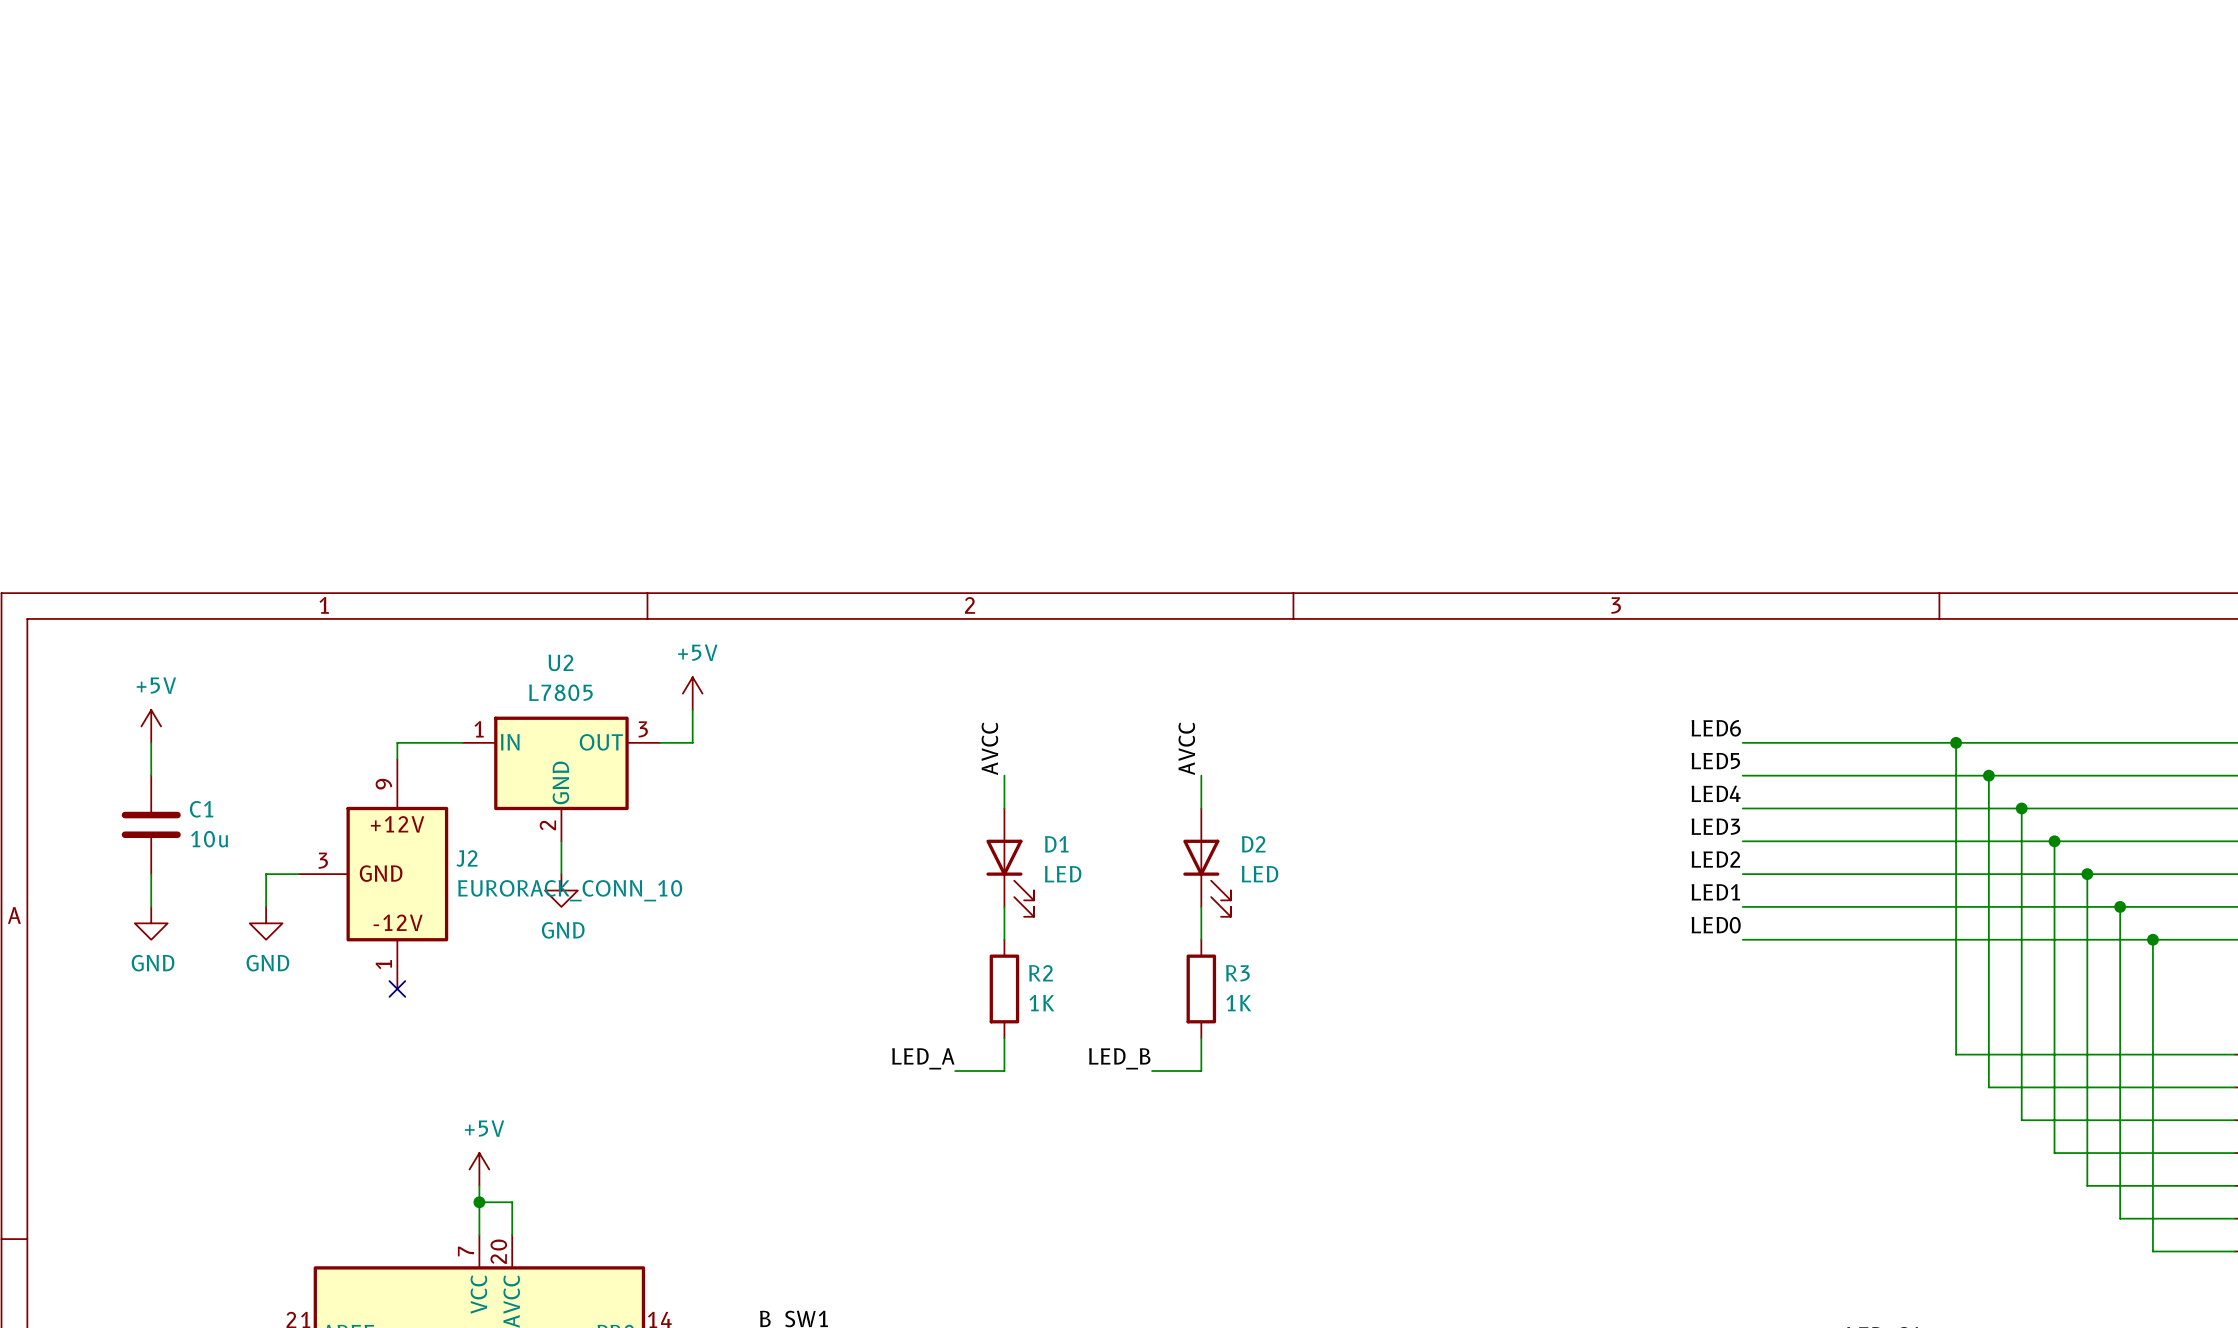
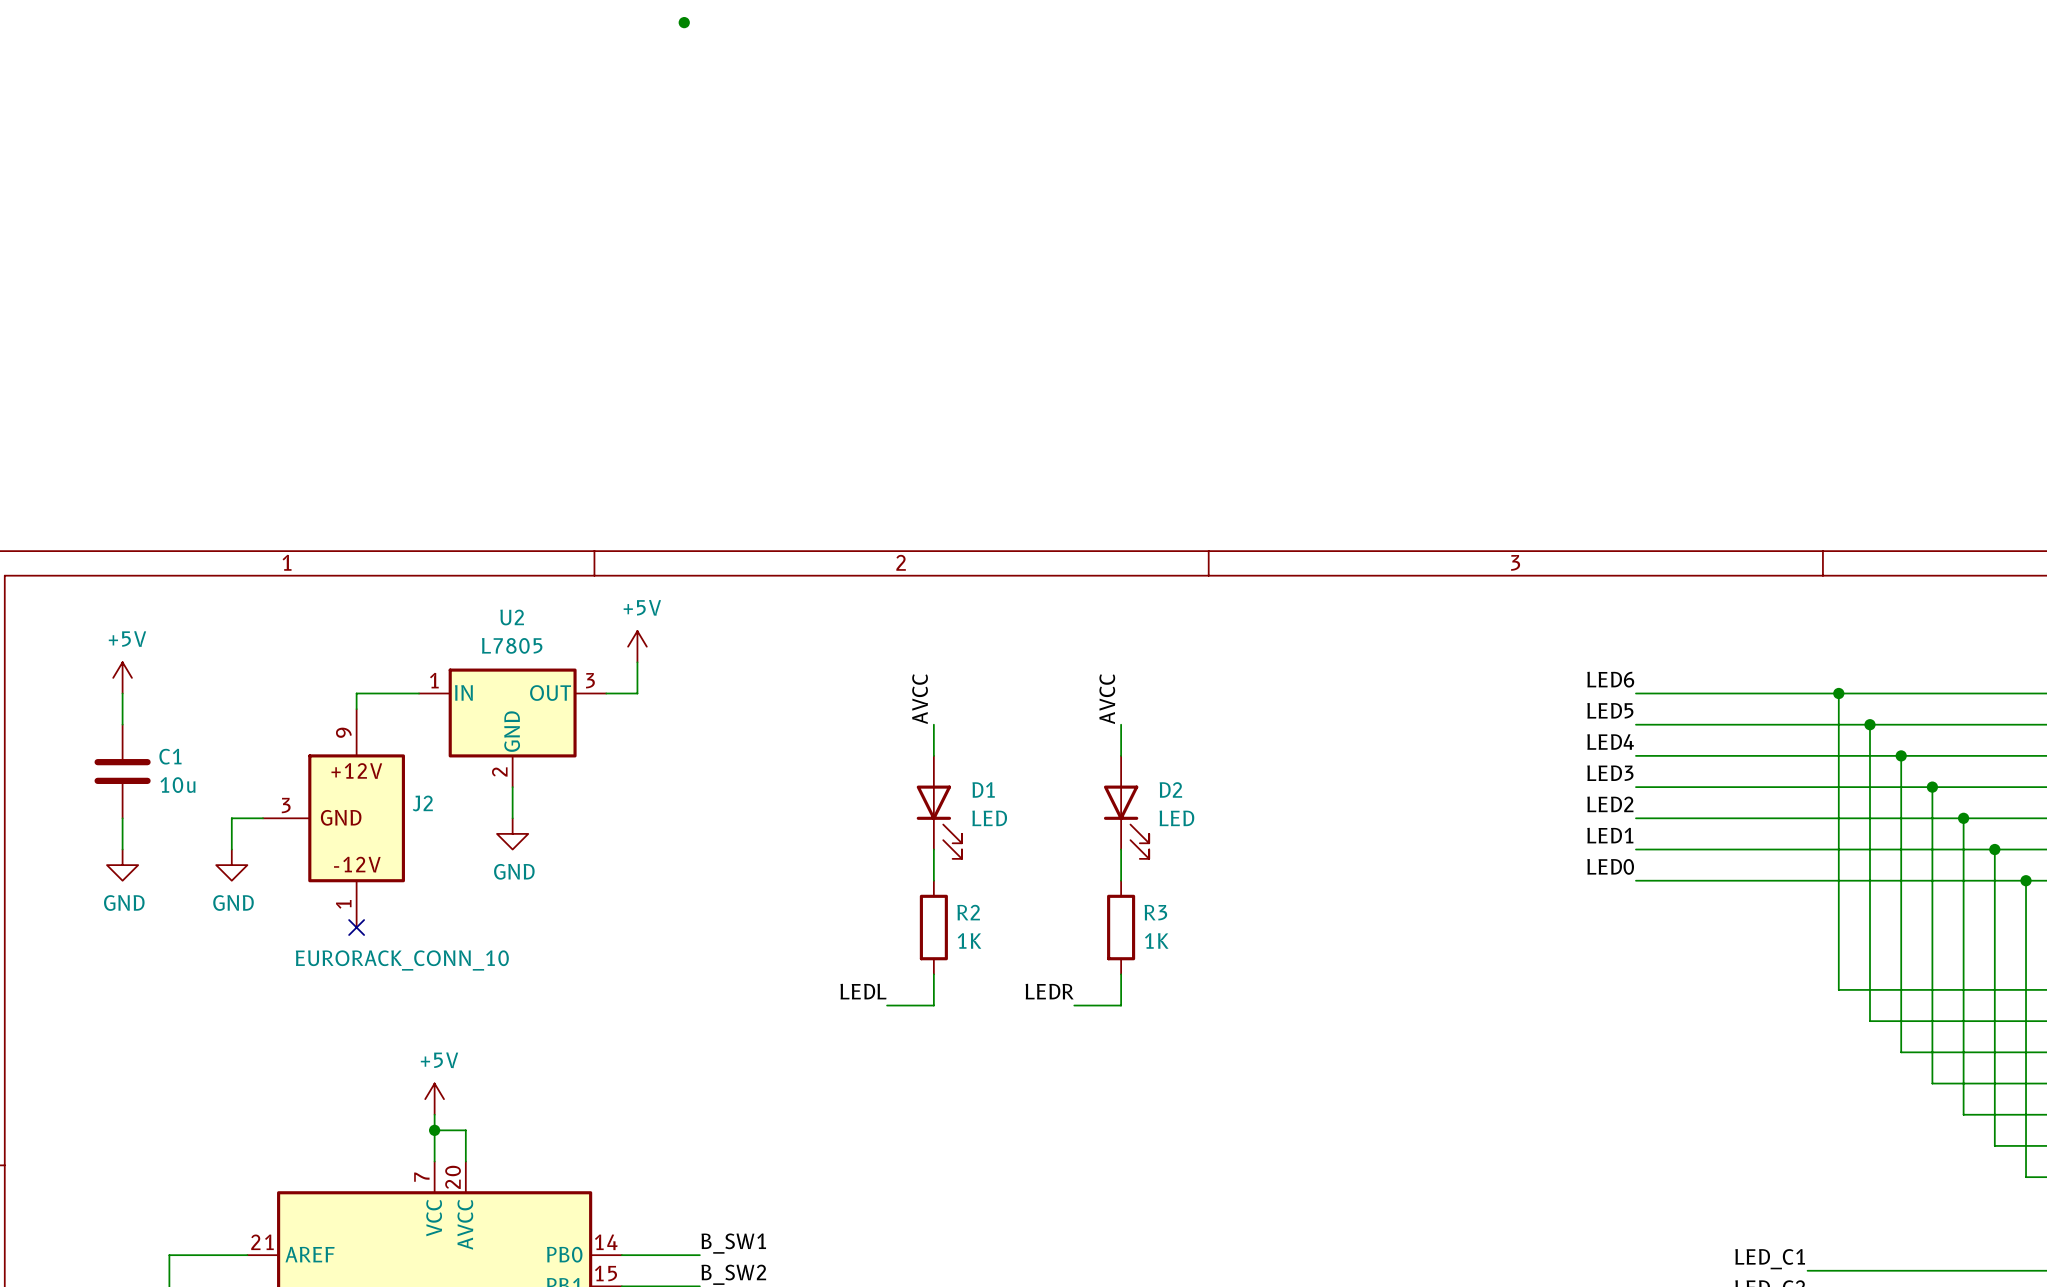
junction: none -> (684, 22)
J2 value position: EURORACK_CONN_10 (570, 890) -> EURORACK_CONN_10 (402, 960)
label: LED_A (923, 1058) -> LEDL (863, 991)
label: LED_B (1119, 1058) -> LEDR (1049, 991)

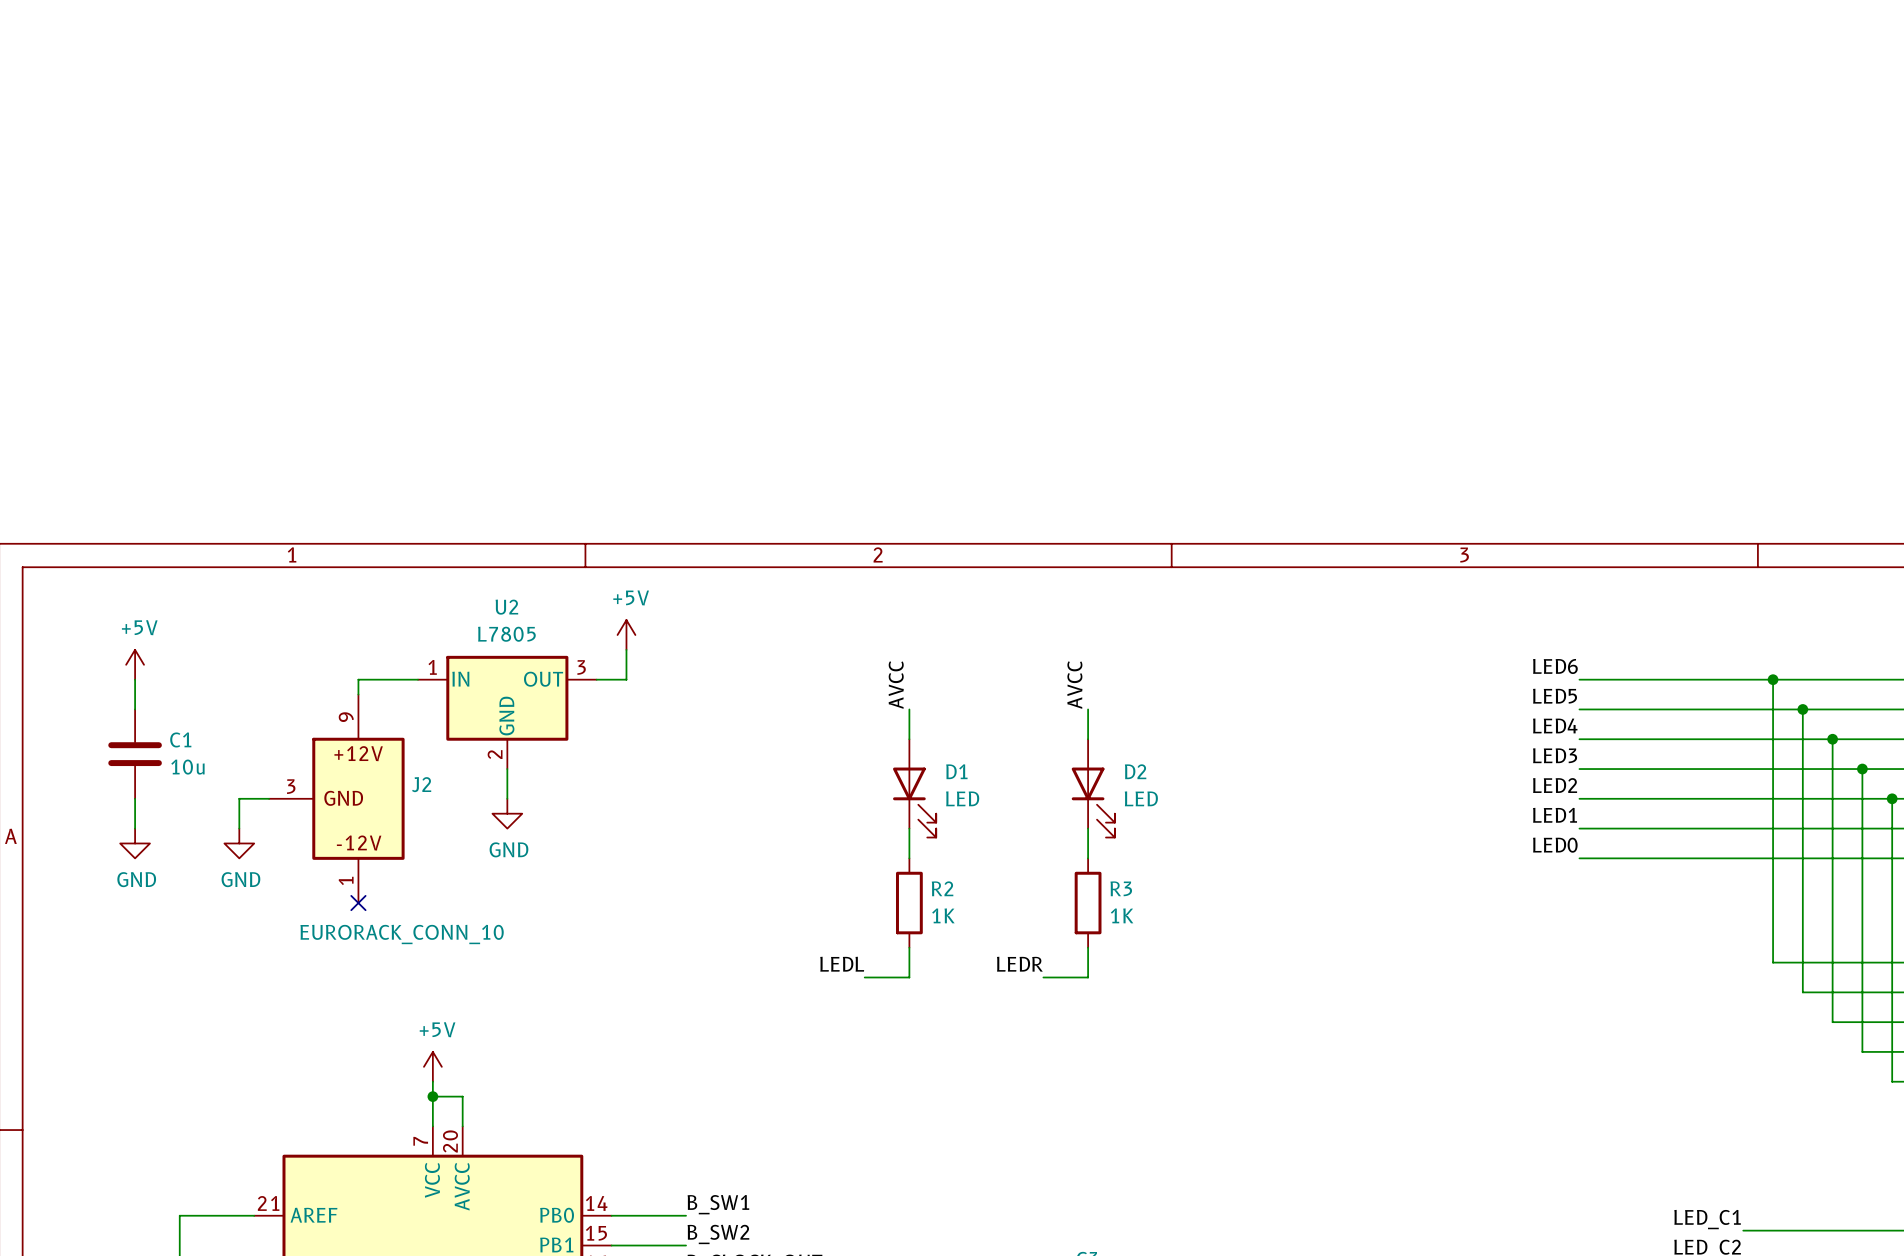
junction: (684, 22) -> none

